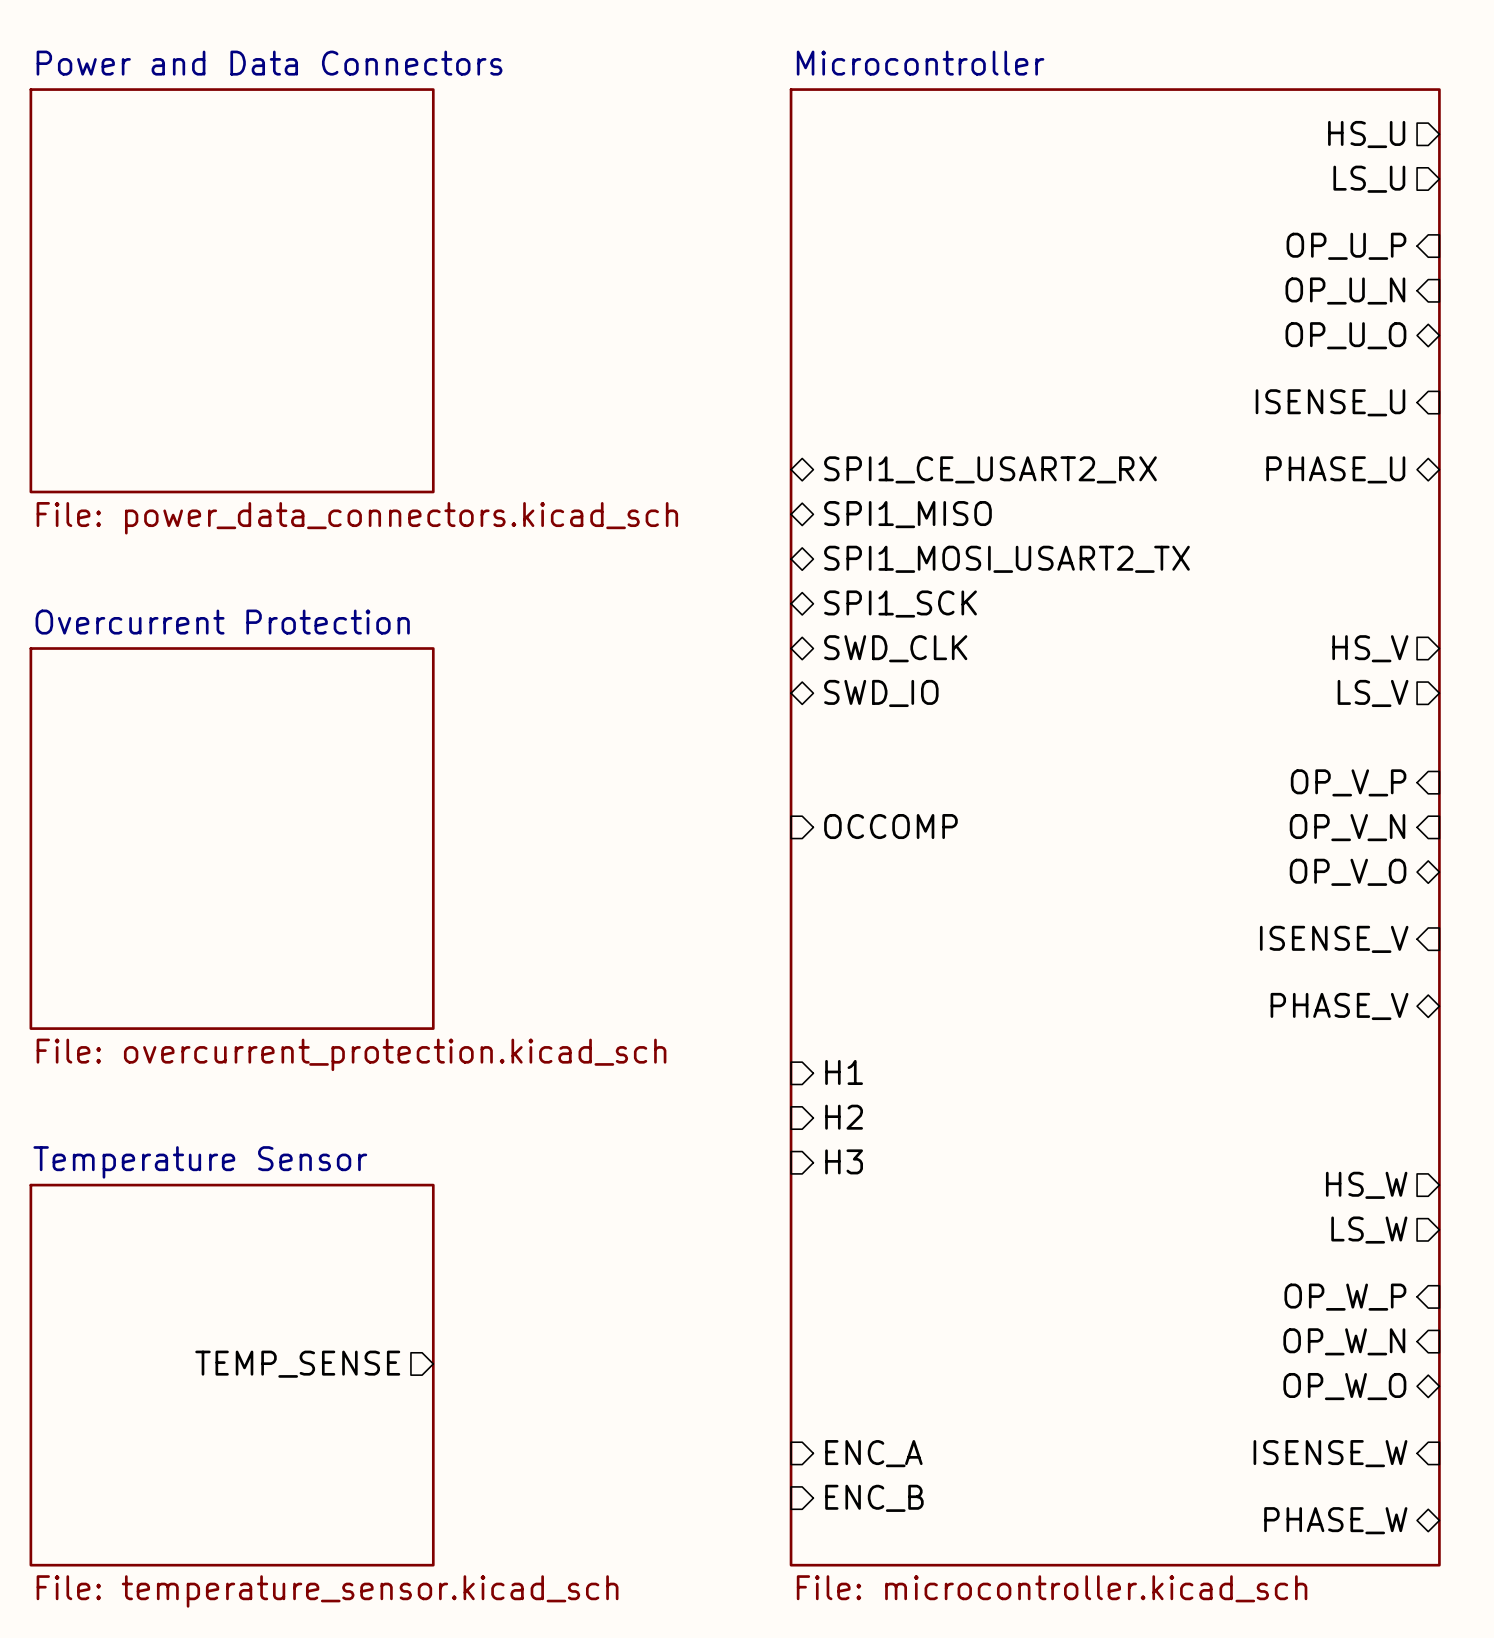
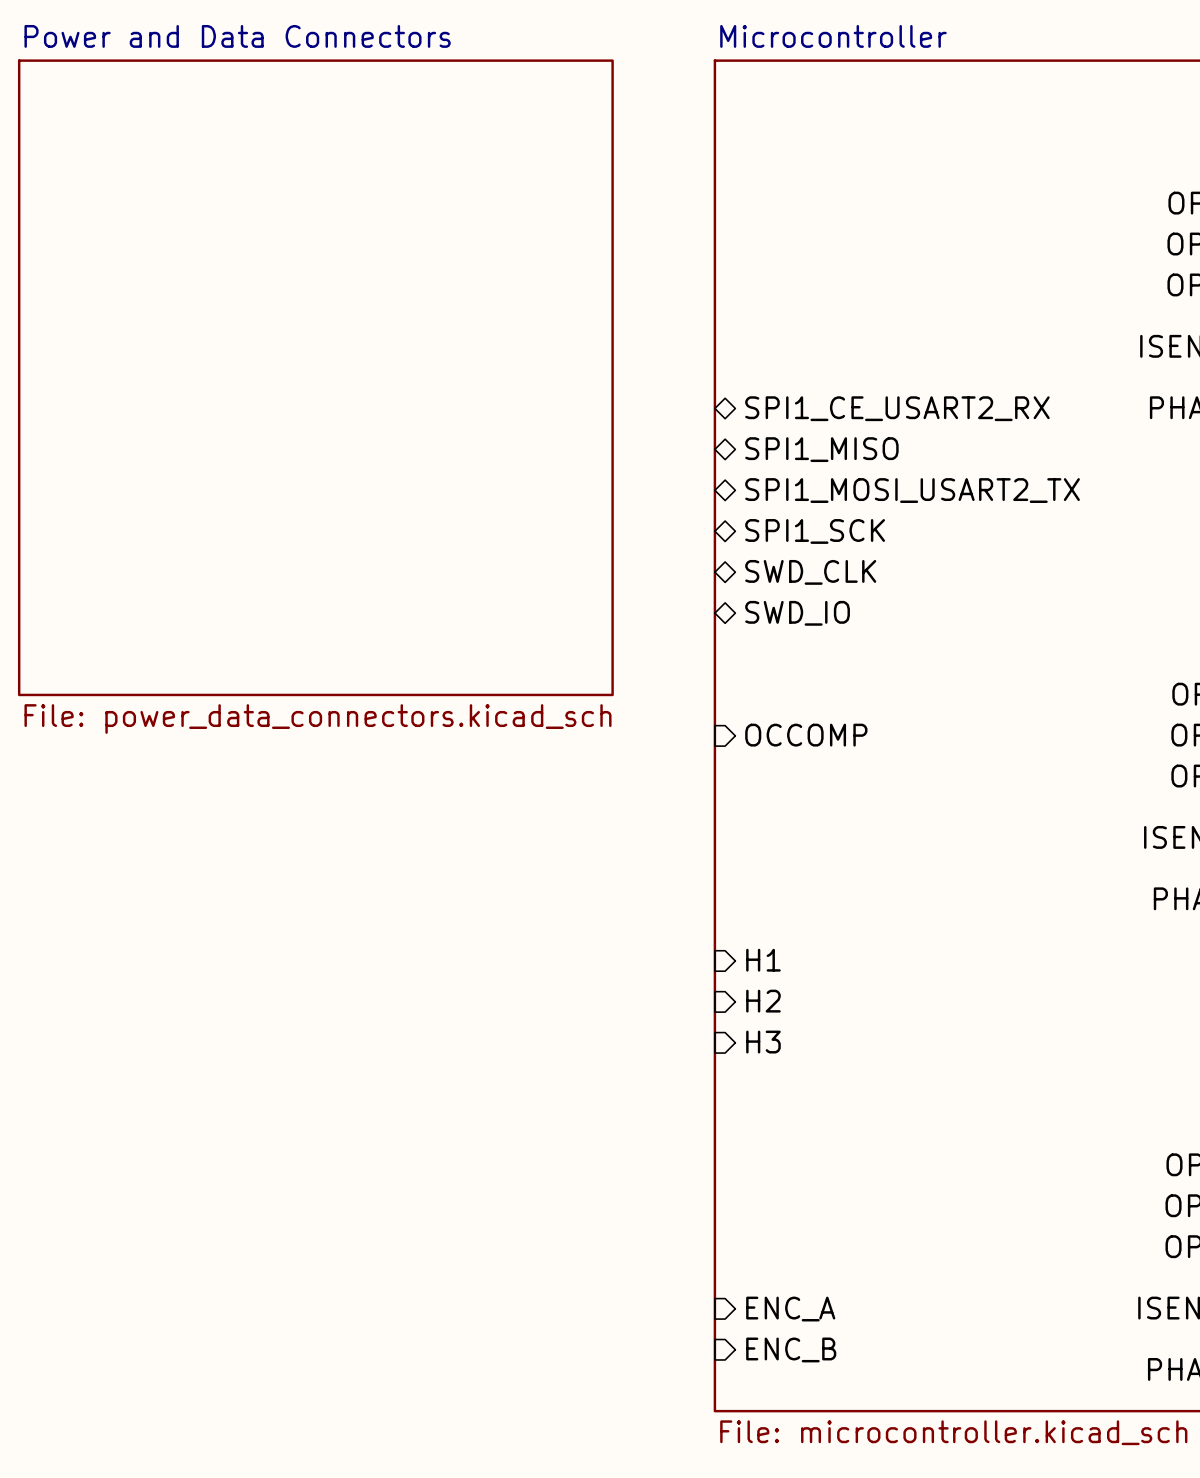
sheet Power and Data Connectors: File: power_data_connectors.kicad_sch (232, 290) -> none
sheet Power and Data Connectors: none -> File: power_data_connectors.kicad_sch (315, 377)
sheet Overcurrent Protection: File: overcurrent_protection.kicad_sch (232, 838) -> none
sheet pin: TEMP_SENSE (297, 1364) -> none
sheet Temperature Sensor: File: temperature_sensor.kicad_sch (232, 1375) -> none

